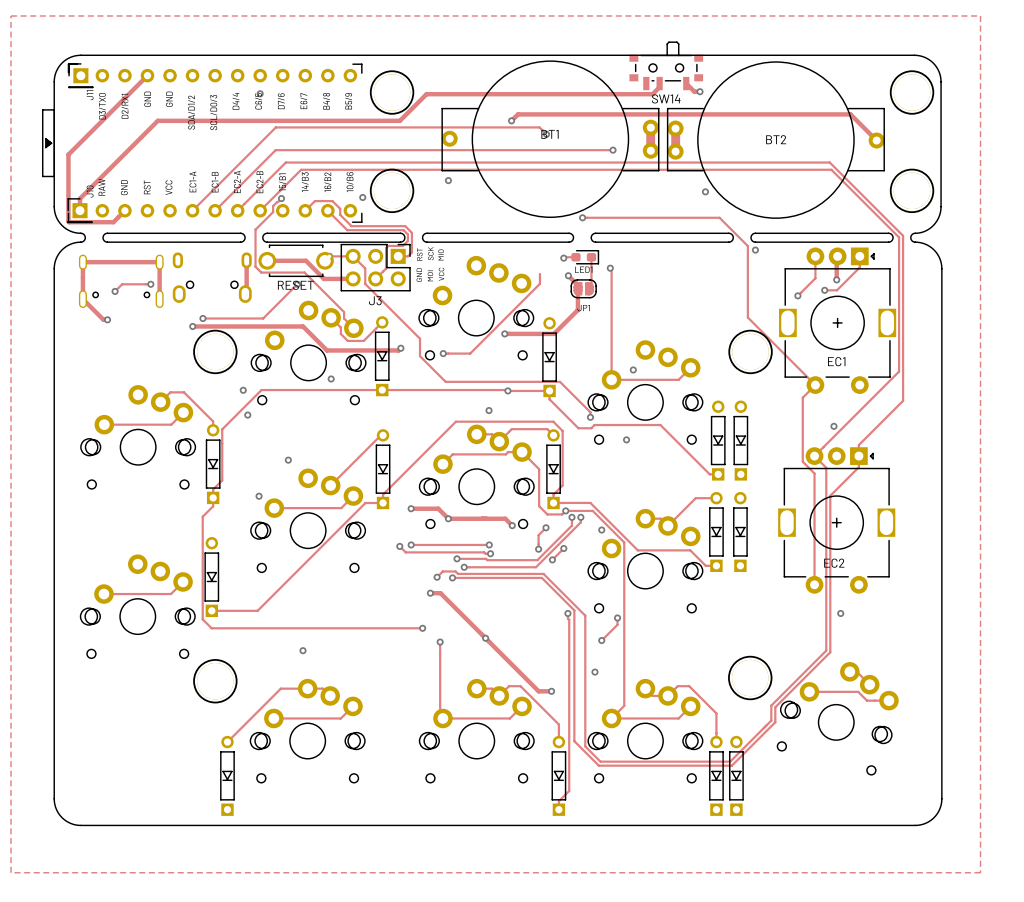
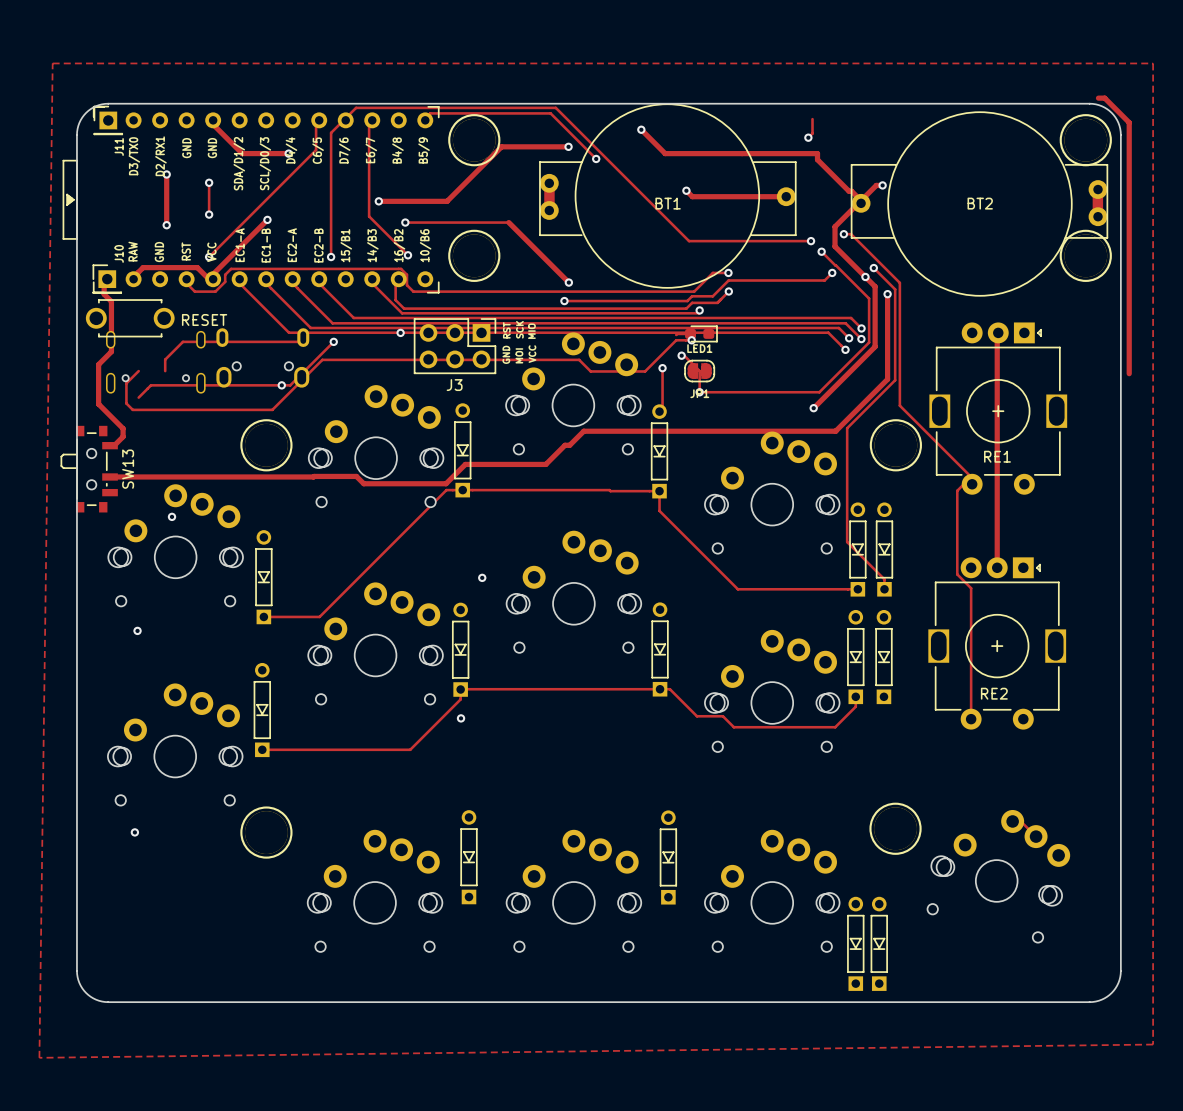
zone outline: (11, 15) (980, 15) (980, 872) (11, 872) (11, 15) -> (52, 63) (39, 1057) (1153, 1044) (1153, 63) (52, 63)
track: none -> (1098, 98) (1104, 98) (1129, 122) (1129, 373)
BT1 footprint: [441, 60, 660, 218] -> [539, 103, 797, 289]
BT2 footprint: [667, 61, 885, 219] -> [850, 111, 1108, 297]
SW14: (666, 65) -> none
track: none -> (812, 119) (812, 133) (808, 137)
track: (147, 75) (68, 154) (69, 222) (113, 222) (124, 210) -> none
track: none -> (210, 121) (242, 153) (288, 153)
track: none -> (316, 121) (316, 150) (209, 257)
track: none -> (369, 121) (369, 216) (407, 255)
track: none -> (422, 121) (430, 113) (550, 113) (596, 158)
track: none -> (641, 129) (665, 153) (817, 153) (817, 159) (861, 200)
via: none -> (641, 129)
track: (659, 83) (659, 87) (652, 94) (426, 94) (399, 120) (157, 120) (80, 198) (80, 210) -> none
track: (686, 83) (694, 91) (700, 91) -> none
via position: (700, 91) -> (808, 137)
via position: (260, 93) -> (288, 153)
track: none -> (568, 146) (501, 146) (447, 201) (378, 201)
via: none -> (568, 146)
track: (511, 120) (517, 114) (850, 114) (876, 140) -> none
via position: (511, 120) -> (596, 158)
track: none -> (166, 174) (166, 225)
via: none -> (166, 174)
track: none -> (209, 182) (209, 214)
via: none -> (209, 182)
track: none -> (882, 185) (876, 185) (835, 226) (835, 246) (875, 286) (875, 346) (813, 408)
via: none -> (882, 185)
track: (546, 134) (539, 127) (275, 127) (192, 210) -> none
via: (546, 134) -> none
track: none -> (686, 190) (692, 196) (786, 196) (786, 200)
via: none -> (686, 190)
via: none -> (378, 201)
track: (613, 150) (275, 150) (215, 210) -> none
via: (613, 150) -> none
via: none -> (209, 214)
track: none -> (267, 219) (210, 277) (210, 280) (197, 267) (143, 267) (130, 280)
via: none -> (267, 219)
track: (333, 162) (285, 162) (237, 210) -> none
via: none -> (405, 222)
track: (421, 162) (829, 162) (903, 235) (903, 400) (858, 445) (858, 467) (830, 495) (830, 652) (775, 707) (775, 722) (731, 765) (598, 765) (574, 741) (574, 610) (541, 577) (452, 577) -> (508, 222) (568, 282)
via: none -> (166, 225)
via: none -> (843, 234)
track: none -> (811, 241) (689, 241) (555, 107) (356, 107) (331, 132) (331, 257)
via: none -> (811, 241)
via: (448, 180) -> none
track: none -> (821, 251) (869, 298) (869, 342) (819, 392) (699, 392) (699, 371) (683, 355)
via: none -> (821, 251)
via: none -> (407, 255)
via: none -> (209, 257)
via: (705, 191) -> none
via: (362, 197) -> none
track: (281, 198) (273, 206) (273, 212) (255, 229) (255, 266) (261, 272) (304, 272) (344, 312) (344, 318) (353, 328) -> none
via position: (281, 198) -> (331, 257)
track: none -> (873, 268) (895, 289) (895, 380) (847, 428) (847, 542) (884, 579) (884, 589)
via: none -> (873, 268)
track: none -> (728, 272) (712, 272) (694, 291) (413, 291) (406, 285) (406, 274) (401, 268) (231, 268) (225, 274) (225, 281) (215, 291) (194, 291) (183, 280)
via: none -> (728, 272)
track: none -> (832, 272) (824, 280) (728, 280) (712, 296) (692, 296) (687, 301) (564, 301)
via: none -> (832, 272)
via: none -> (865, 276)
track: (260, 210) (301, 169) (831, 169) (899, 237) (899, 371) (814, 456) (826, 467) (826, 650) (771, 705) (771, 720) (730, 761) (600, 761) (585, 746) (585, 615) (543, 573) (458, 573) (455, 571) (442, 571) (437, 577) -> none
track: (305, 210) (314, 201) (332, 201) (340, 208) (340, 214) (351, 226) (405, 226) (411, 232) (411, 252) (407, 256) (398, 256) -> none
track: (327, 210) (347, 230) (403, 230) (407, 234) (407, 240) (402, 245) (388, 245) (386, 248) (386, 268) (375, 278) -> none
track: none -> (104, 280) (104, 294) (111, 301) (111, 351) (98, 364) (98, 404) (123, 428) (123, 436) (114, 445) (110, 445)
track: none -> (236, 280) (288, 332) (828, 332) (845, 349)
track: none -> (263, 280) (310, 328) (838, 328) (849, 338)
track: none -> (289, 280) (332, 323) (845, 323) (861, 339)
track: none -> (316, 280) (353, 318) (851, 318) (861, 328)
track: none -> (369, 280) (402, 313) (699, 313) (699, 310)
track: none -> (395, 280) (395, 300) (404, 308) (686, 308) (692, 302) (717, 302) (728, 291)
via: none -> (568, 282)
track: (582, 217) (719, 217) (747, 246) (747, 317) (815, 385) (802, 397) -> (843, 234) (851, 234) (899, 282) (899, 405) (971, 476) (957, 490) (957, 499)
via: (582, 217) -> none
via: none -> (728, 291)
track: none -> (887, 294) (887, 379) (835, 431) (583, 431) (569, 445) (565, 445) (545, 464) (465, 464) (446, 483) (363, 483) (356, 476) (110, 476)
via: none -> (887, 294)
via: none -> (564, 301)
board edge: (107, 233) (240, 233) (245, 237) (240, 242) (107, 242) (103, 237) (107, 233) -> none
board edge: (267, 233) (400, 233) (404, 237) (400, 242) (267, 242) (262, 237) (267, 233) -> none
board edge: (427, 233) (569, 233) (573, 237) (569, 242) (427, 242) (422, 237) (427, 233) -> none
board edge: (595, 233) (728, 233) (733, 237) (728, 242) (595, 242) (591, 237) (595, 233) -> none
board edge: (755, 233) (888, 233) (893, 237) (888, 242) (755, 242) (751, 237) (755, 233) -> none
via: none -> (699, 310)
part: none -> (130, 318)
via: (755, 250) -> none
via: none -> (861, 328)
track: (815, 256) (815, 278) (797, 295) -> none
track: (859, 256) (859, 267) (836, 290) (824, 290) -> none
track: (591, 257) (591, 286) (589, 288) -> none
via position: (563, 258) -> (691, 340)
track: (246, 260) (246, 295) -> none
track: (267, 260) (305, 260) (324, 278) (353, 278) -> none
part: (296, 260) -> none
track: (324, 260) (329, 256) (353, 256) (365, 268) (365, 283) (420, 338) (420, 356) (445, 381) (560, 381) (590, 412) (590, 417) -> none
via: none -> (849, 338)
via: none -> (861, 339)
track: none -> (691, 340) (676, 340) (645, 371) (590, 371) (579, 359) (322, 359) (272, 409) (132, 409) (126, 403) (126, 383) (138, 371)
track: none -> (307, 341) (182, 341) (165, 359) (165, 371)
track: none -> (333, 341) (290, 385) (150, 385) (138, 397)
track: (610, 268) (611, 379) (678, 379) (690, 367) -> none
via: (610, 268) -> none
via: none -> (845, 349)
track: (539, 273) (539, 283) (470, 353) (443, 353) -> none
track: (568, 275) (577, 285) (577, 310) (554, 333) (504, 333) -> none
track: none -> (997, 360) (997, 567)
via: (836, 279) -> none
track: (150, 284) (122, 284) (115, 291) -> none
via: (150, 284) -> none
track: (297, 284) (263, 318) (202, 318) -> none
via position: (297, 284) -> (333, 341)
track: none -> (662, 368) (662, 408) (659, 411)
via: none -> (662, 368)
via: (824, 290) -> none
via: (115, 291) -> none
via: (797, 295) -> none
track: (159, 299) (159, 262) (82, 262) (82, 299) (103, 319) (107, 319) -> none
via: none -> (281, 385)
via: none -> (699, 392)
track: (331, 317) (340, 327) (340, 334) (347, 340) (363, 340) (382, 322) -> none
via: (202, 318) -> none
via: (107, 319) -> none
via: none -> (813, 408)
track: (192, 326) (303, 326) (326, 350) (398, 350) (400, 348) -> none
via: (192, 326) -> none
via: (504, 333) -> none
via: (400, 348) -> none
via: (443, 353) -> none
EC1 name: EC1 (836, 361) -> RE1 (997, 456)
via: (633, 369) -> none
SW13: none -> (89, 469)
via: (331, 378) -> none
via: (243, 390) -> none
track: (368, 390) (261, 390) (222, 429) (222, 480) (213, 489) (213, 506) (202, 516) (202, 619) (211, 628) (422, 628) -> (446, 490) (319, 616) (263, 616)
via: (507, 390) -> none
track: (549, 399) (578, 428) (591, 428) (594, 425) (660, 425) (709, 474) -> (659, 501) (659, 510) (737, 589) (847, 589)
track: (160, 402) (170, 392) (184, 392) (213, 421) (213, 430) -> none
via: (489, 410) -> none
via: none -> (172, 516)
track: (183, 412) (171, 424) (104, 424) -> none
via: (247, 415) -> none
via: (590, 417) -> none
via: (833, 426) -> none
track: (476, 434) (492, 434) (499, 441) (511, 429) (547, 429) (553, 435) -> none
track: (383, 435) (330, 485) -> none
via: (626, 439) -> none
via: (288, 460) -> none
via: none -> (482, 577)
track: (442, 464) (452, 454) (505, 454) (508, 452) (522, 452) (539, 469) (539, 506) (547, 514) (562, 514) (565, 510) (592, 510) (624, 542) (624, 705) (611, 718) (678, 718) (690, 706) -> none
part position: (383, 469) -> (460, 649)
part position: (553, 469) -> (660, 649)
via: (259, 496) -> none
track: (353, 496) (341, 508) (274, 508) -> none
track: (716, 498) (695, 498) (667, 525) (660, 518) (645, 518) -> none
track: (562, 502) (590, 502) (637, 550) (690, 550) (705, 565) (716, 565) -> none
track: (561, 503) (553, 503) (553, 494) (562, 485) (562, 431) (553, 421) (455, 421) (383, 494) (383, 502) (365, 502) (257, 610) -> (855, 696) (855, 706) (835, 727) (733, 727) (722, 716) (696, 716) (669, 689) (460, 689) (460, 699) (410, 749) (316, 749)
track: (411, 508) (438, 508) (448, 518) (505, 518) (512, 525) -> none
via: (411, 508) -> none
via: none -> (137, 630)
via: (565, 510) -> none
track: (571, 517) (571, 525) (537, 560) (457, 558) -> none
via: (571, 517) -> none
track: (580, 517) (580, 522) (535, 567) (464, 567) -> none
via: (580, 517) -> none
via: (448, 518) -> none
via: (512, 525) -> none
track: (546, 527) (538, 535) (538, 549) -> none
via: (546, 527) -> none
via: (601, 530) -> none
track: (411, 544) (489, 544) -> none
via: (411, 544) -> none
via: (489, 544) -> none
track: (399, 546) (405, 552) (490, 553) -> none
via: (399, 546) -> none
track: (563, 548) (552, 559) -> none
via: (563, 548) -> none
via: (538, 549) -> none
via: (490, 553) -> none
via: (457, 558) -> none
via: (552, 559) -> none
EC2 name: EC2 (834, 563) -> RE2 (994, 693)
via: (464, 567) -> none
via: (437, 577) -> none
via: (452, 577) -> none
track: (183, 581) (170, 594) (103, 594) -> none
via: none -> (461, 718)
track: (430, 593) (440, 593) (538, 691) (551, 691) -> none
via: (430, 593) -> none
track: (567, 613) (569, 790) (558, 801) (558, 809) -> none
via: (567, 613) -> none
via: (840, 613) -> none
track: (617, 617) (617, 624) (601, 640) -> none
via: (617, 617) -> none
via: (422, 628) -> none
via: (485, 638) -> none
via: (601, 640) -> none
track: (440, 642) (440, 715) (442, 718) (509, 718) (522, 706) -> none
via: (440, 642) -> none
via: (303, 650) -> none
via: (594, 672) -> none
via: none -> (134, 832)
track: (476, 688) (492, 688) (499, 695) (509, 686) (520, 686) (558, 724) (558, 742) -> none
track: (645, 688) (652, 695) (667, 695) (677, 686) (689, 686) (716, 713) (716, 742) -> none
via: (551, 691) -> none
track: (809, 691) (858, 691) (867, 700) (888, 700) -> none
track: (330, 695) (322, 688) (280, 688) (227, 742) -> none
part: none -> (469, 857)
track: (352, 706) (340, 718) (273, 718) -> none
part: (227, 775) -> none
part position: (558, 775) -> (668, 857)
board edge: (54, 798) (54, 266) (56, 258) (62, 249) (70, 244) (83, 241) (85, 237) (82, 233) (72, 232) (63, 227) (54, 212) (54, 81) (56, 71) (62, 63) (70, 57) (80, 55) (914, 55) (922, 56) (931, 61) (937, 69) (940, 79) (940, 209) (933, 225) (925, 231) (913, 233) (910, 237) (913, 241) (925, 244) (934, 249) (939, 258) (941, 266) (941, 798) -> (76, 970) (76, 135) (79, 122) (86, 112) (96, 106) (108, 103) (1089, 103) (1098, 105) (1109, 110) (1118, 122) (1120, 135) (1120, 970)

